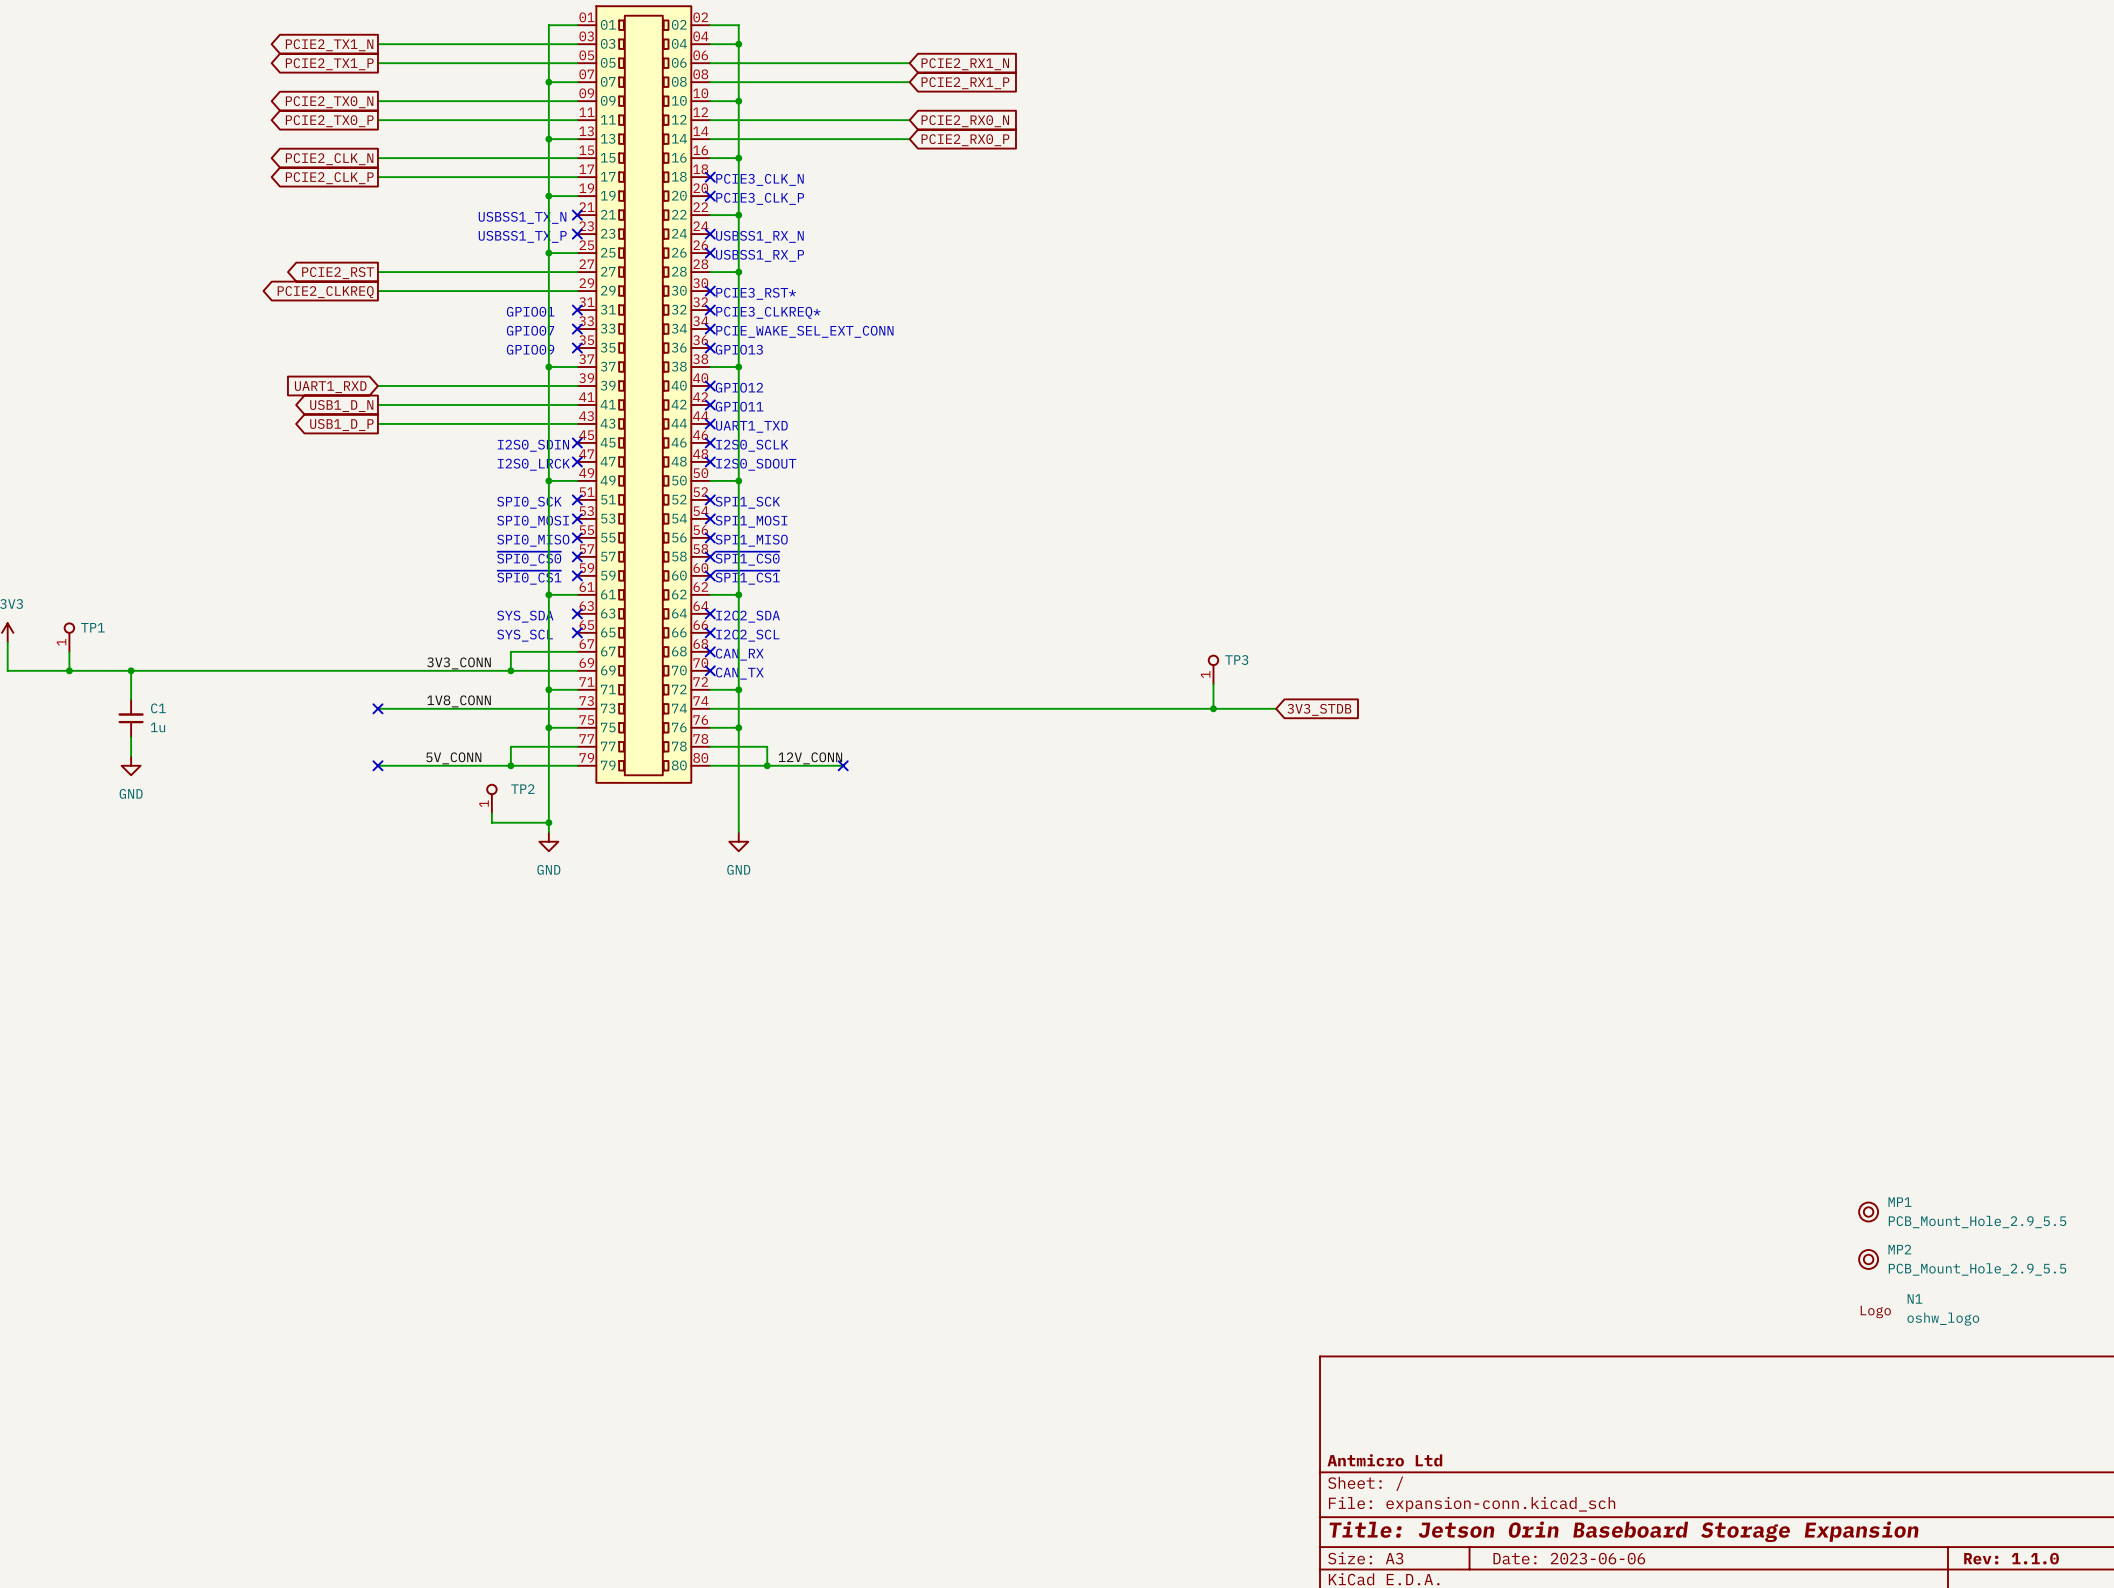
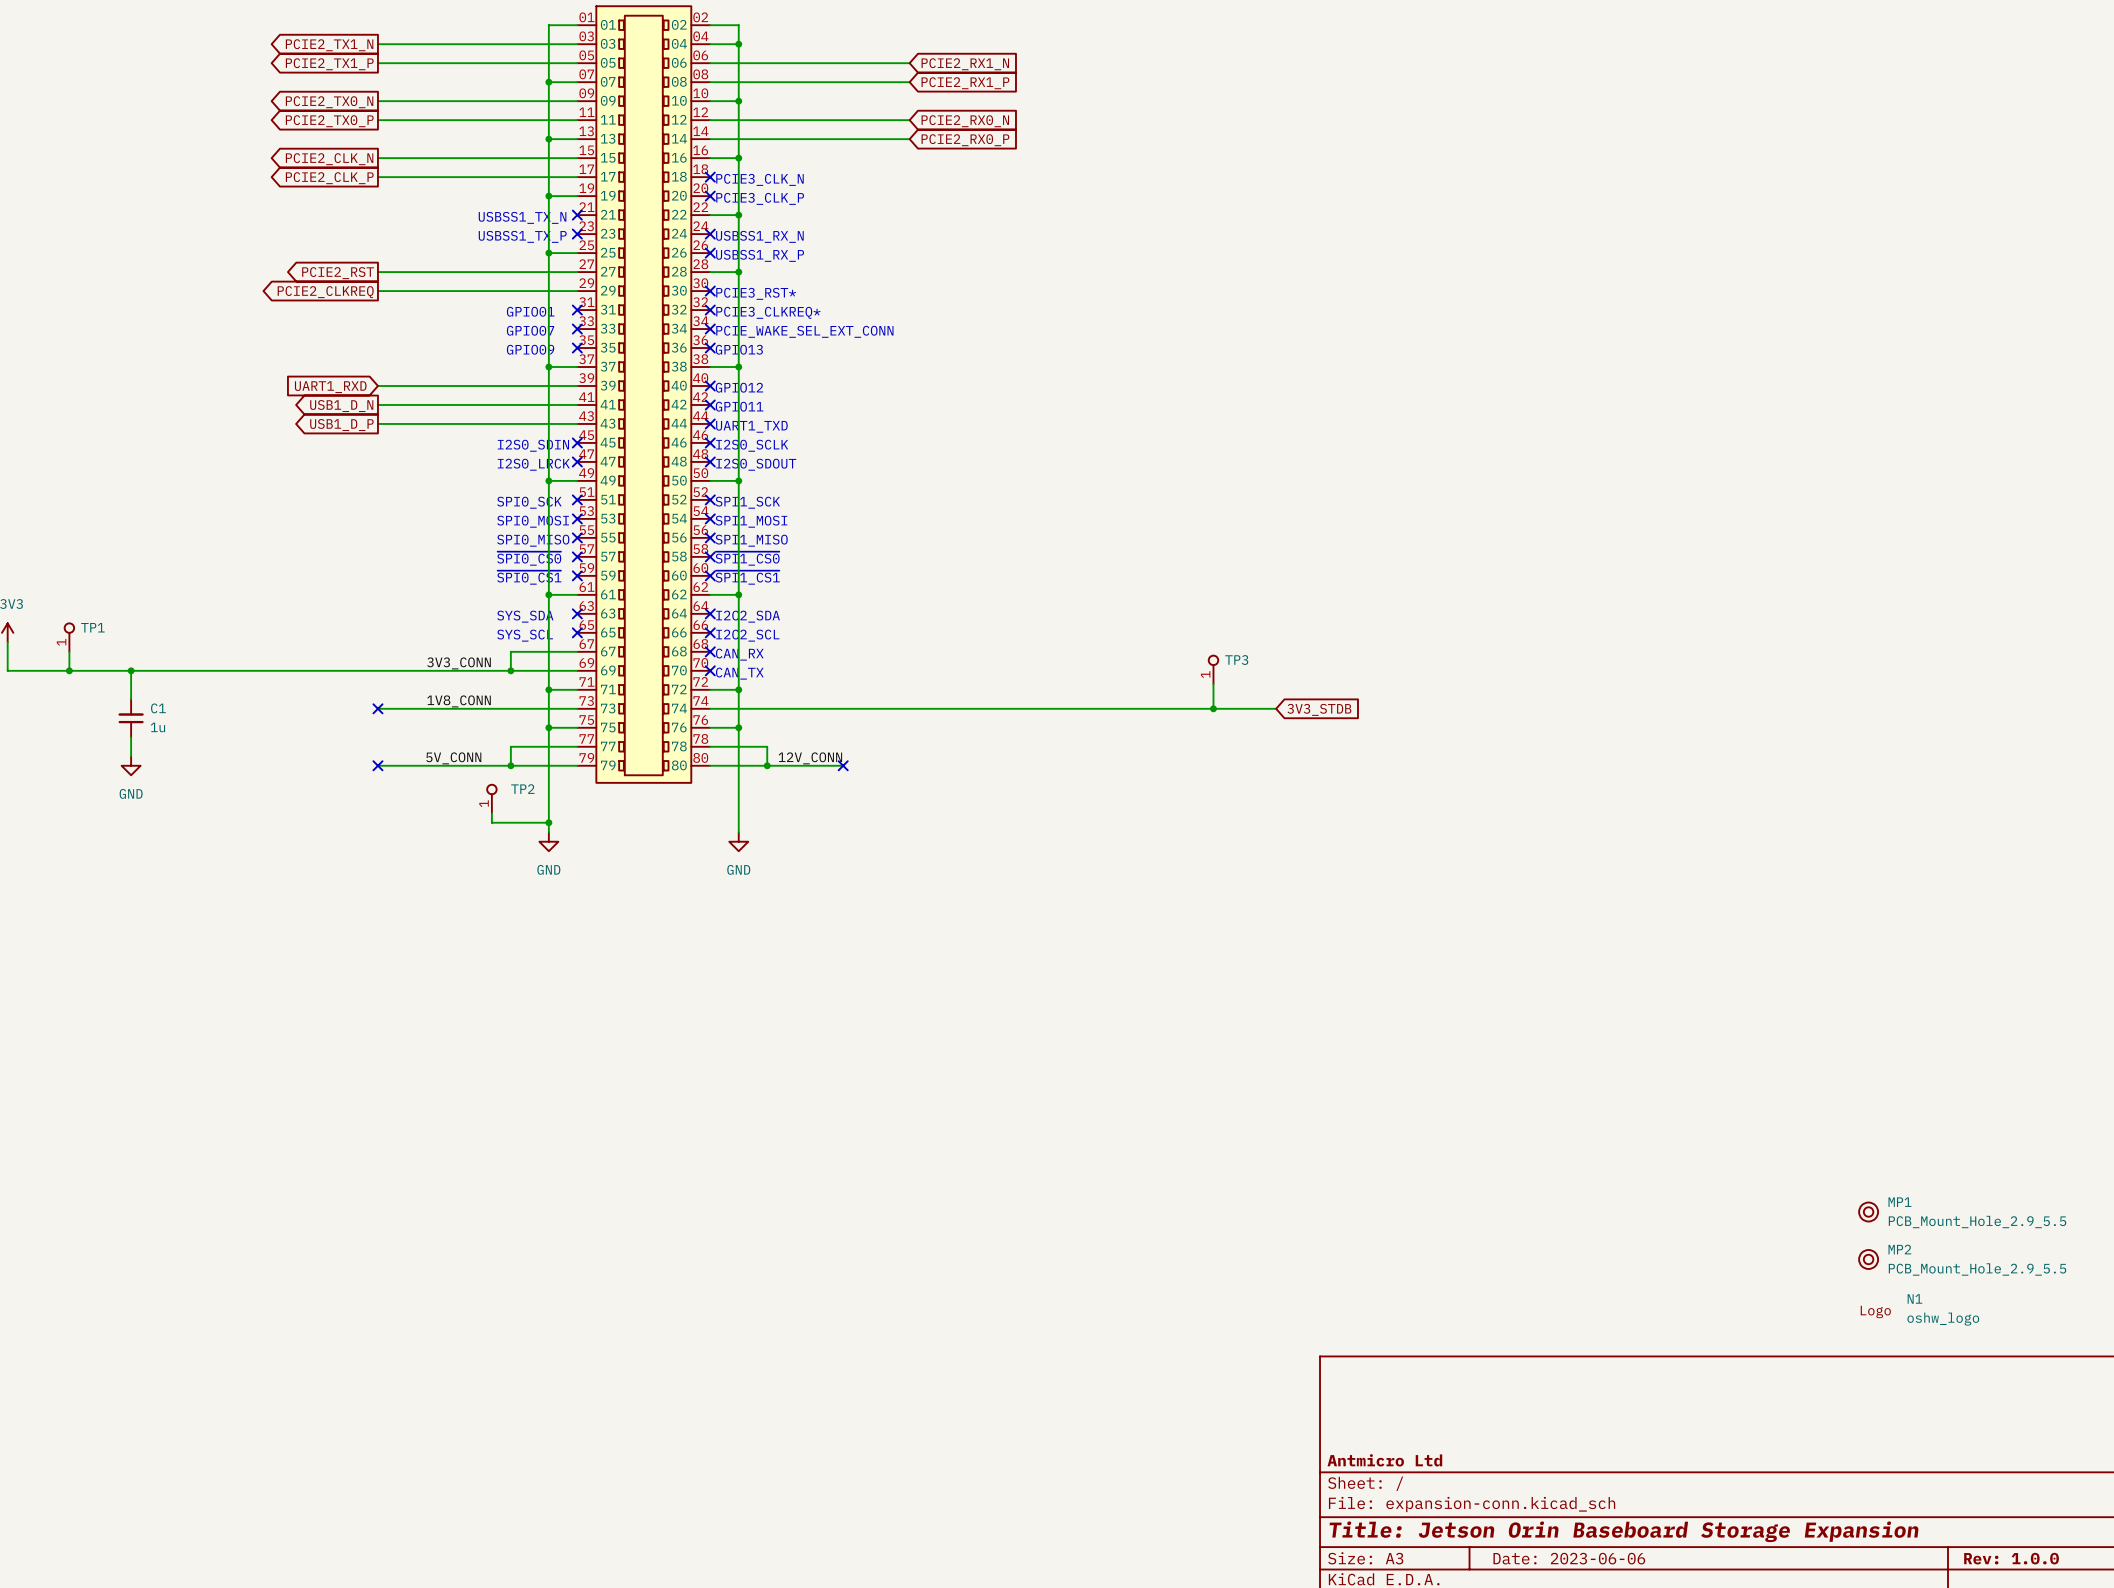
title block: Rev: 1.1.0 (2011, 1558) -> Rev: 1.0.0 (2011, 1558)

